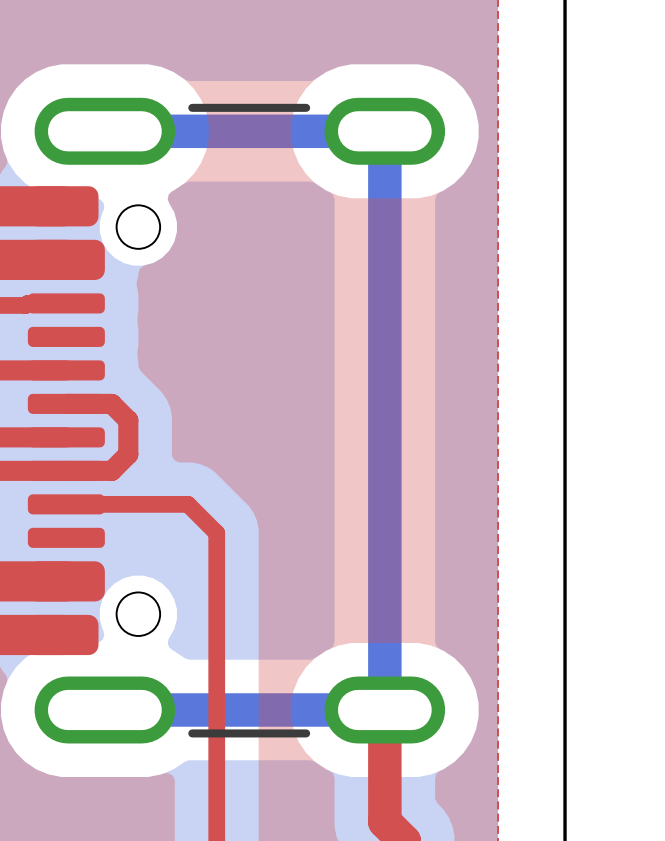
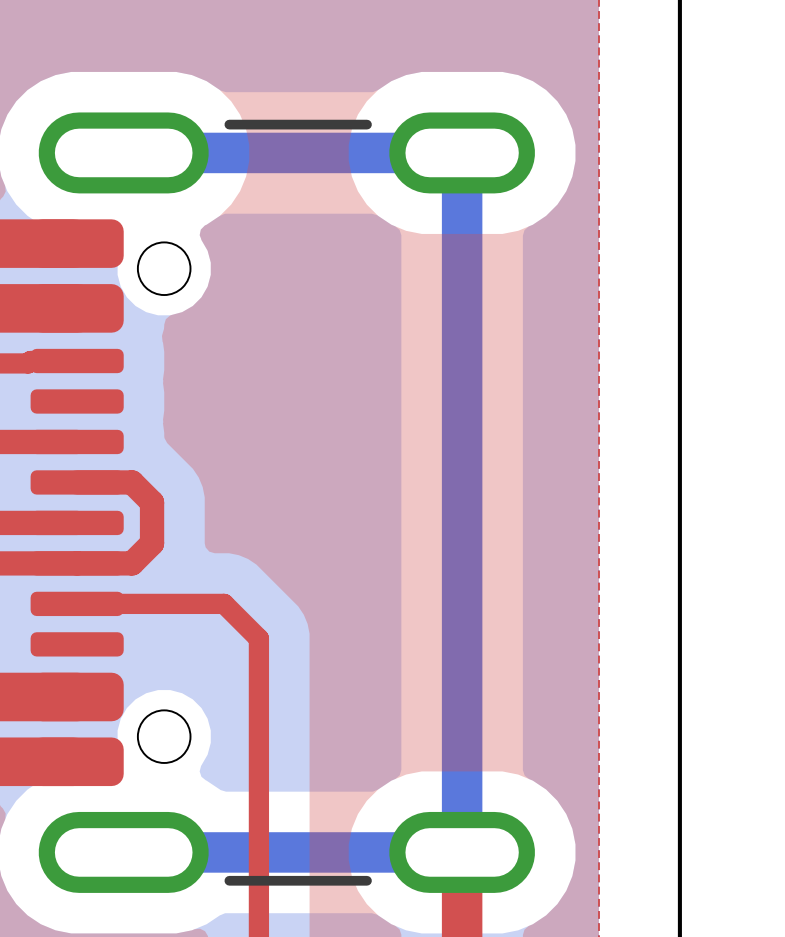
part footprint: [27, 97, 446, 744] -> [30, 112, 535, 893]

